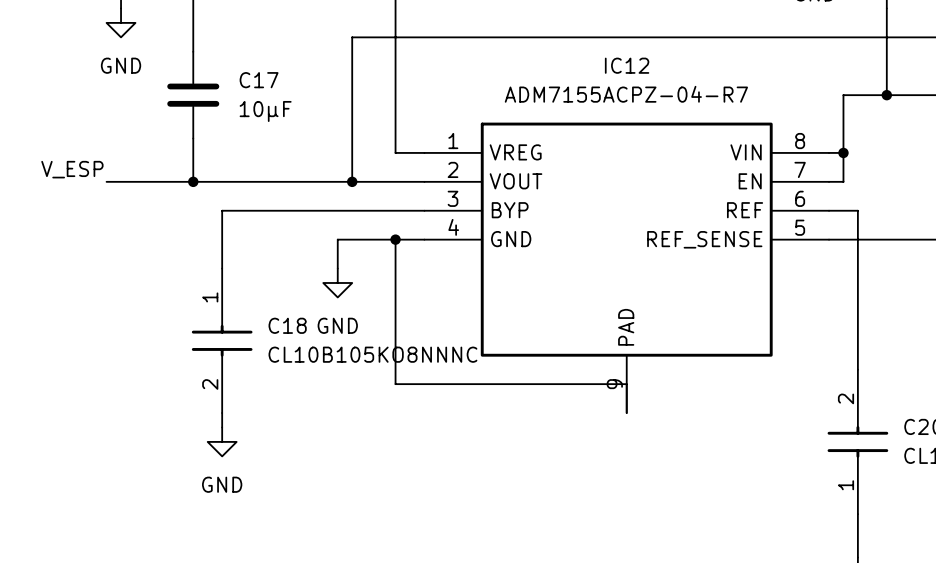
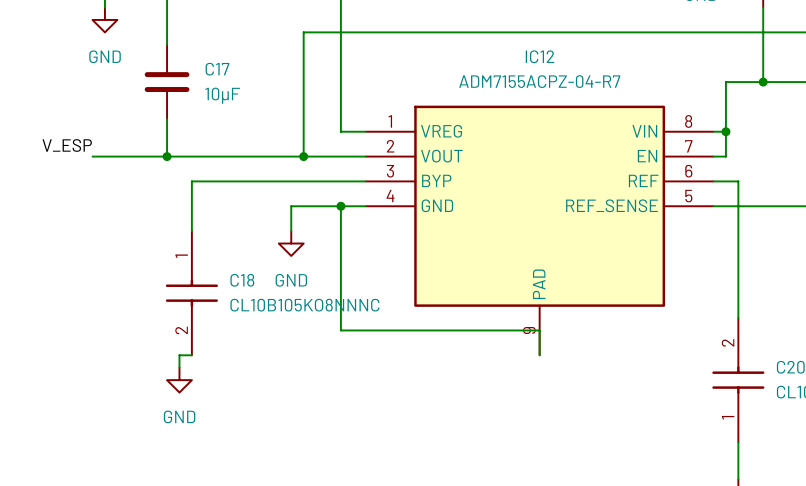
wire: (222, 413) (222, 427) -> (191, 355) (179, 355) (179, 367)
power symbol position: GND (222, 441) -> GND (179, 380)

